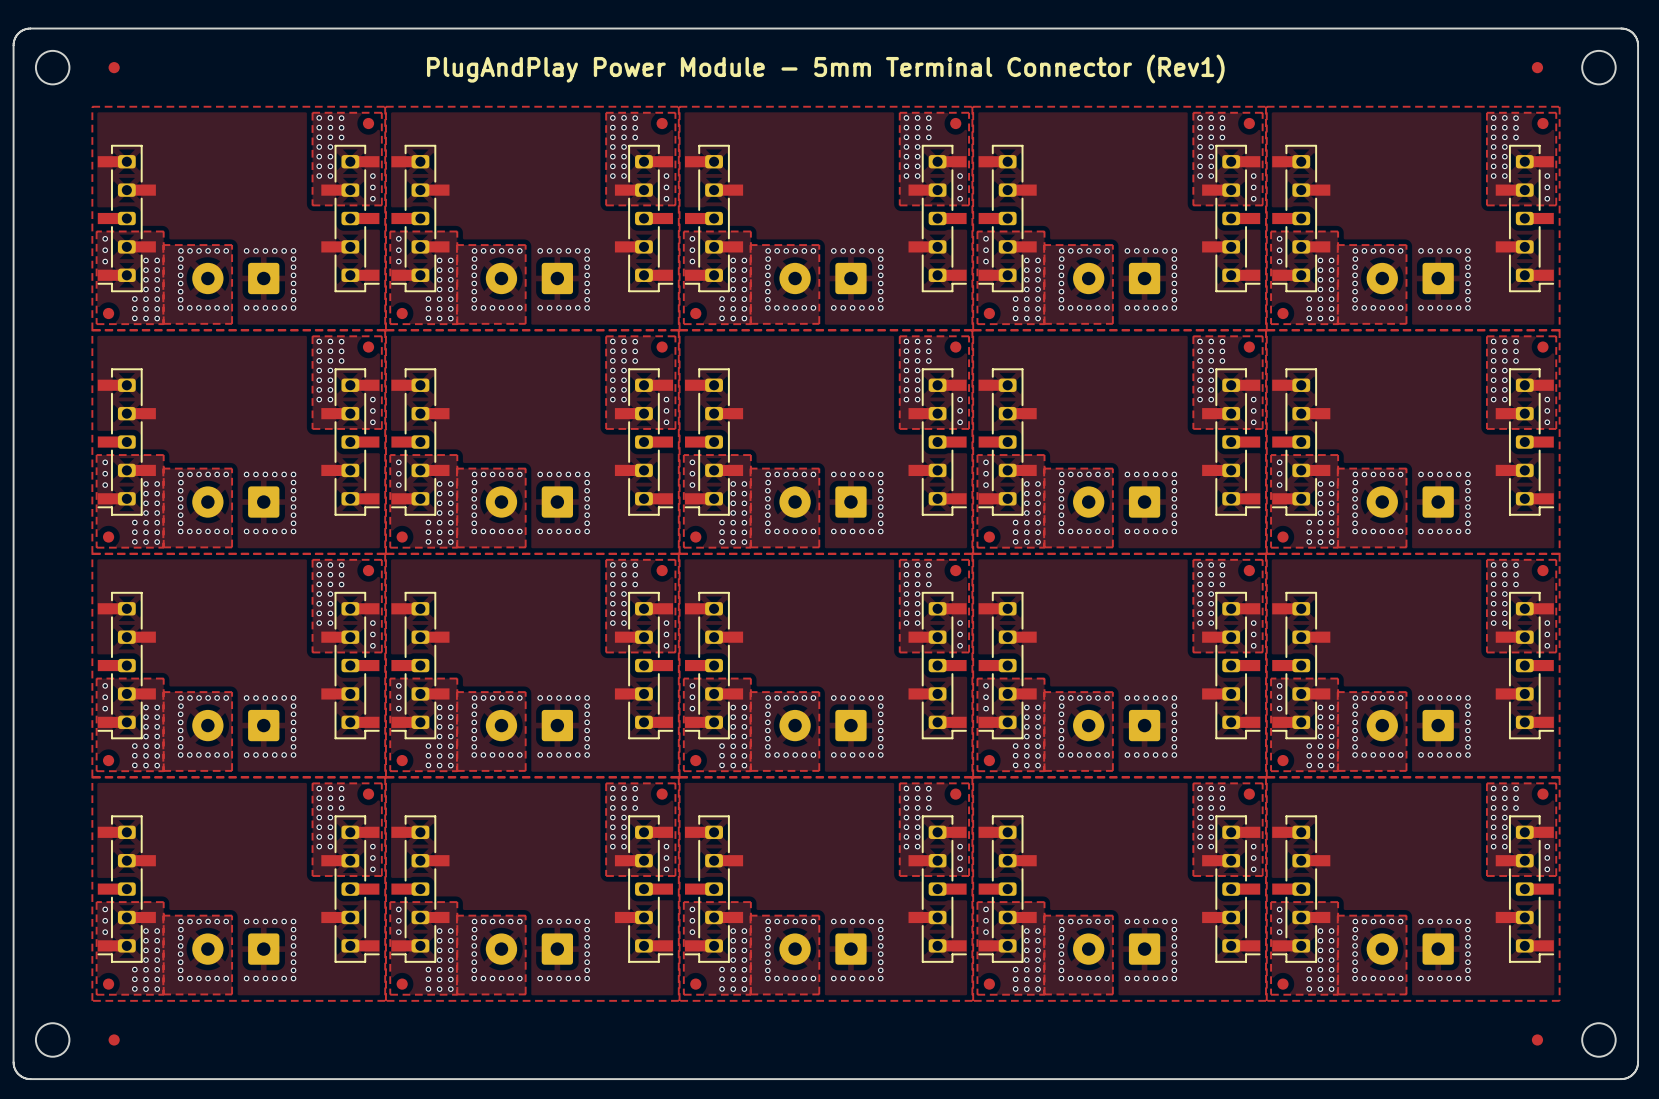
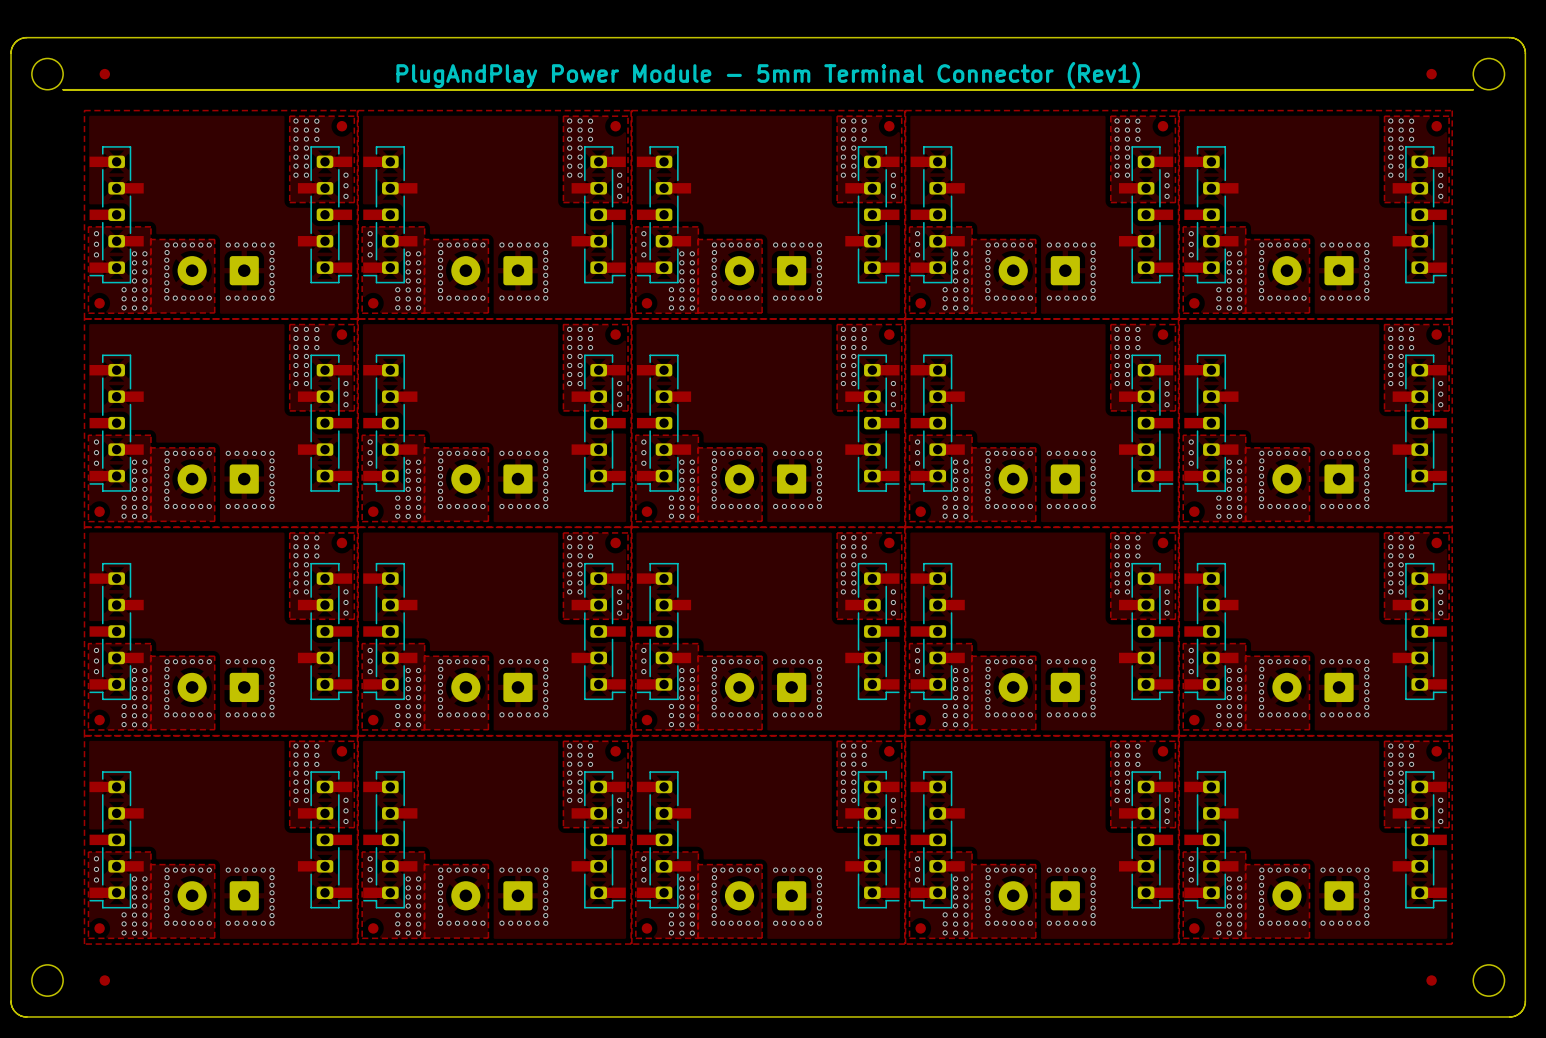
board edge: none -> (63, 89) (1473, 89)

